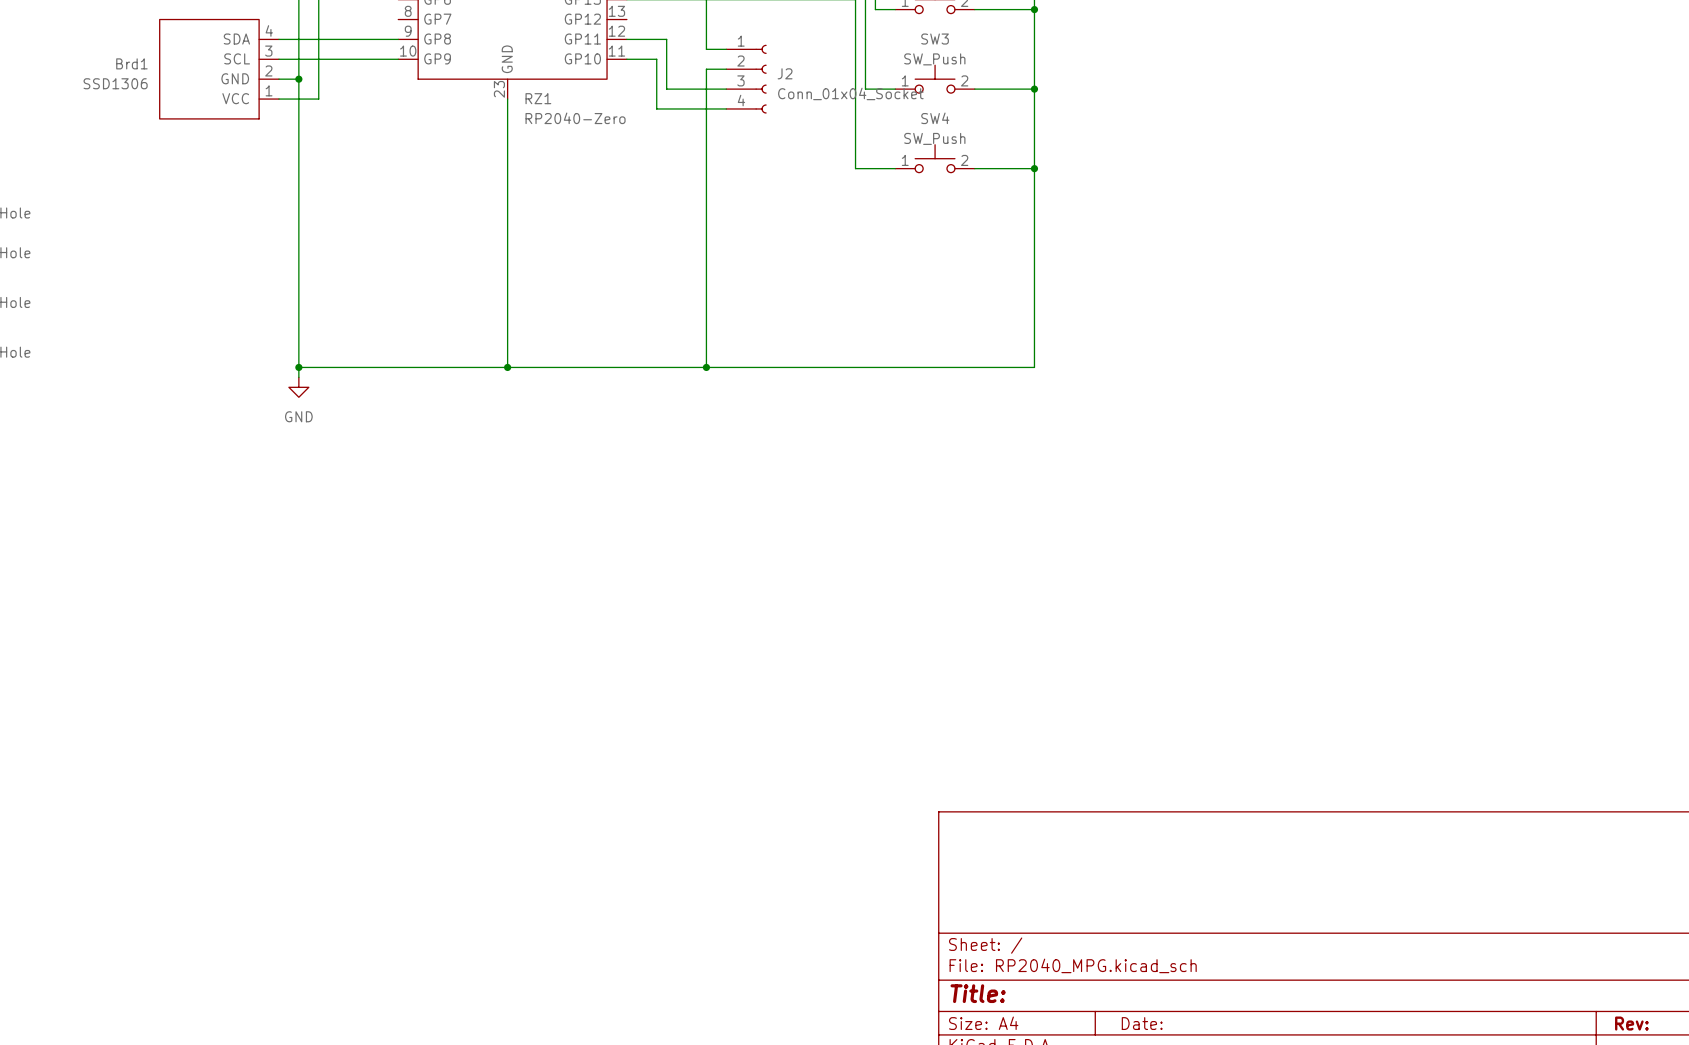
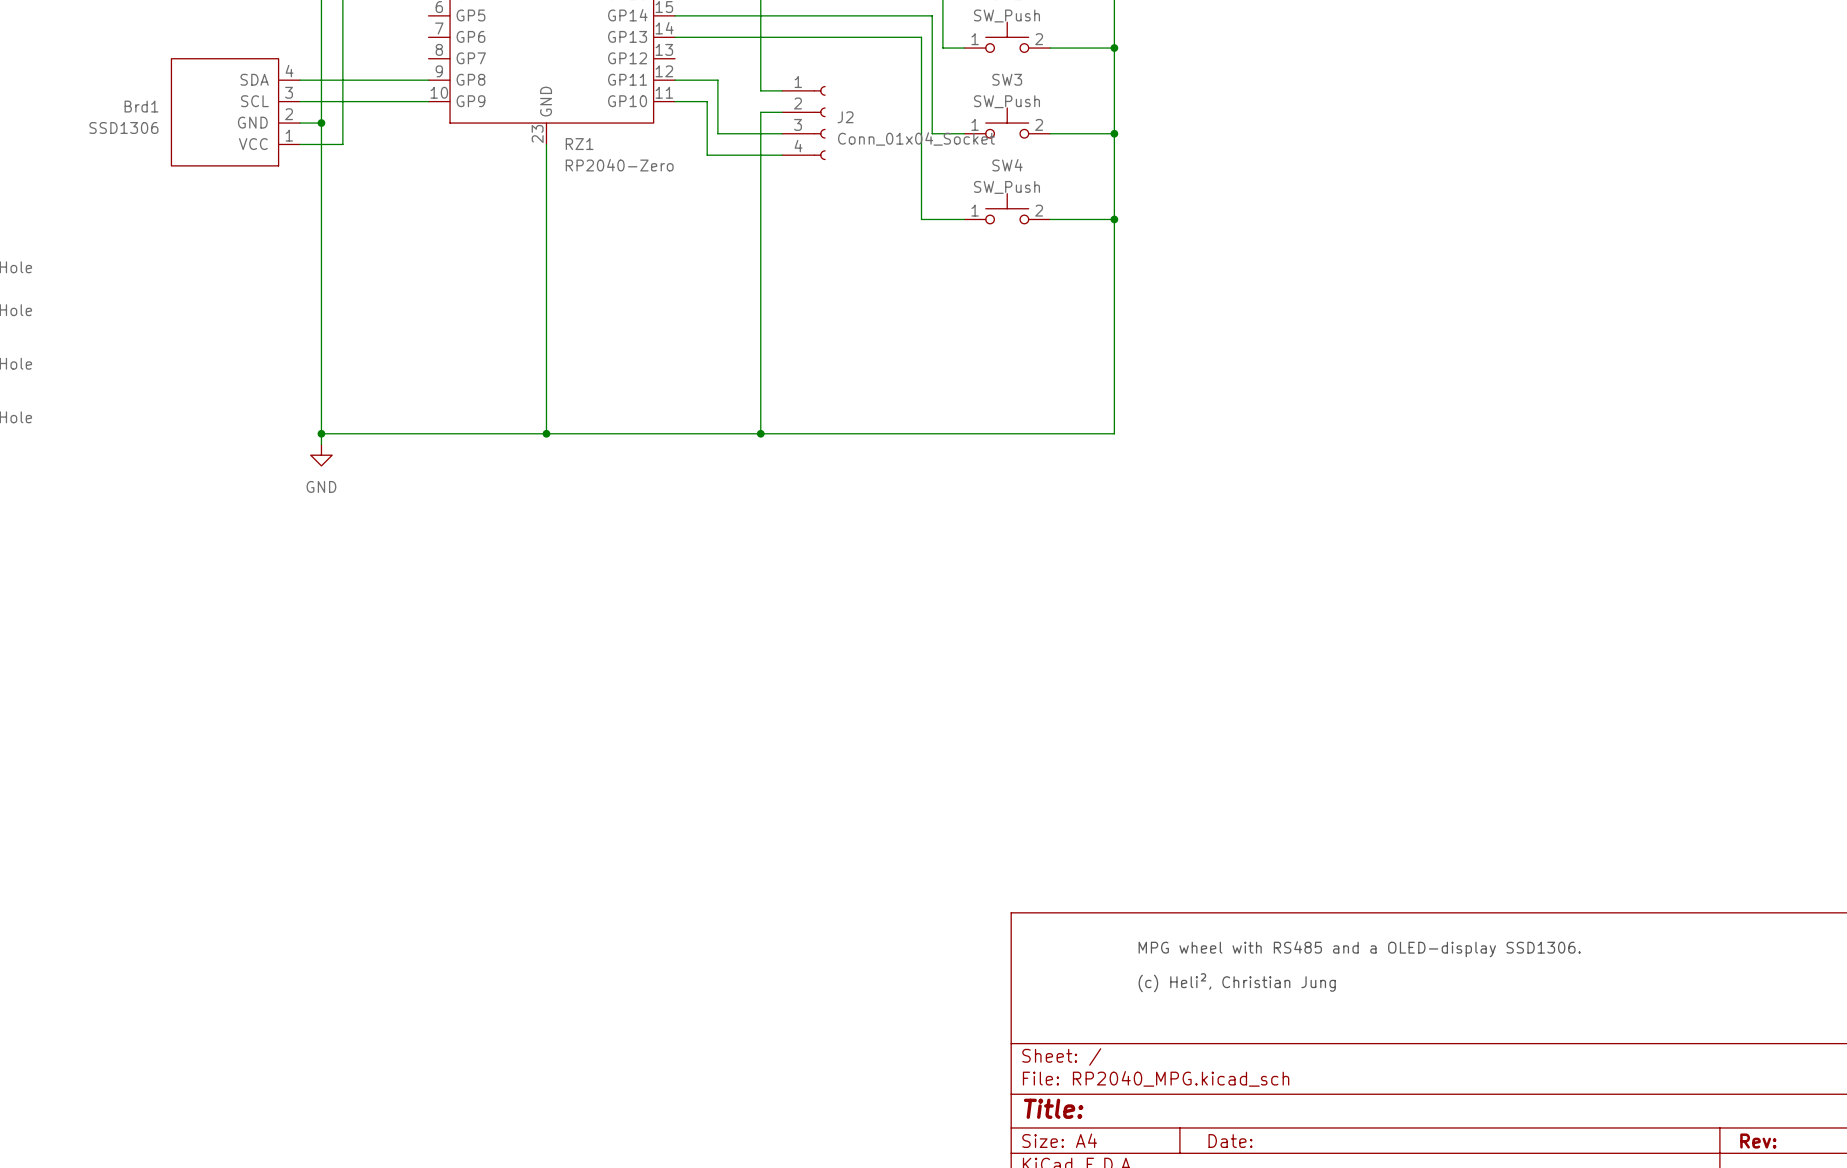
text: none -> MPG wheel with RS485 and a OLED-display SSD1306. (1359, 949)
text: none -> (c) Heli², Christian Jung (1237, 982)

